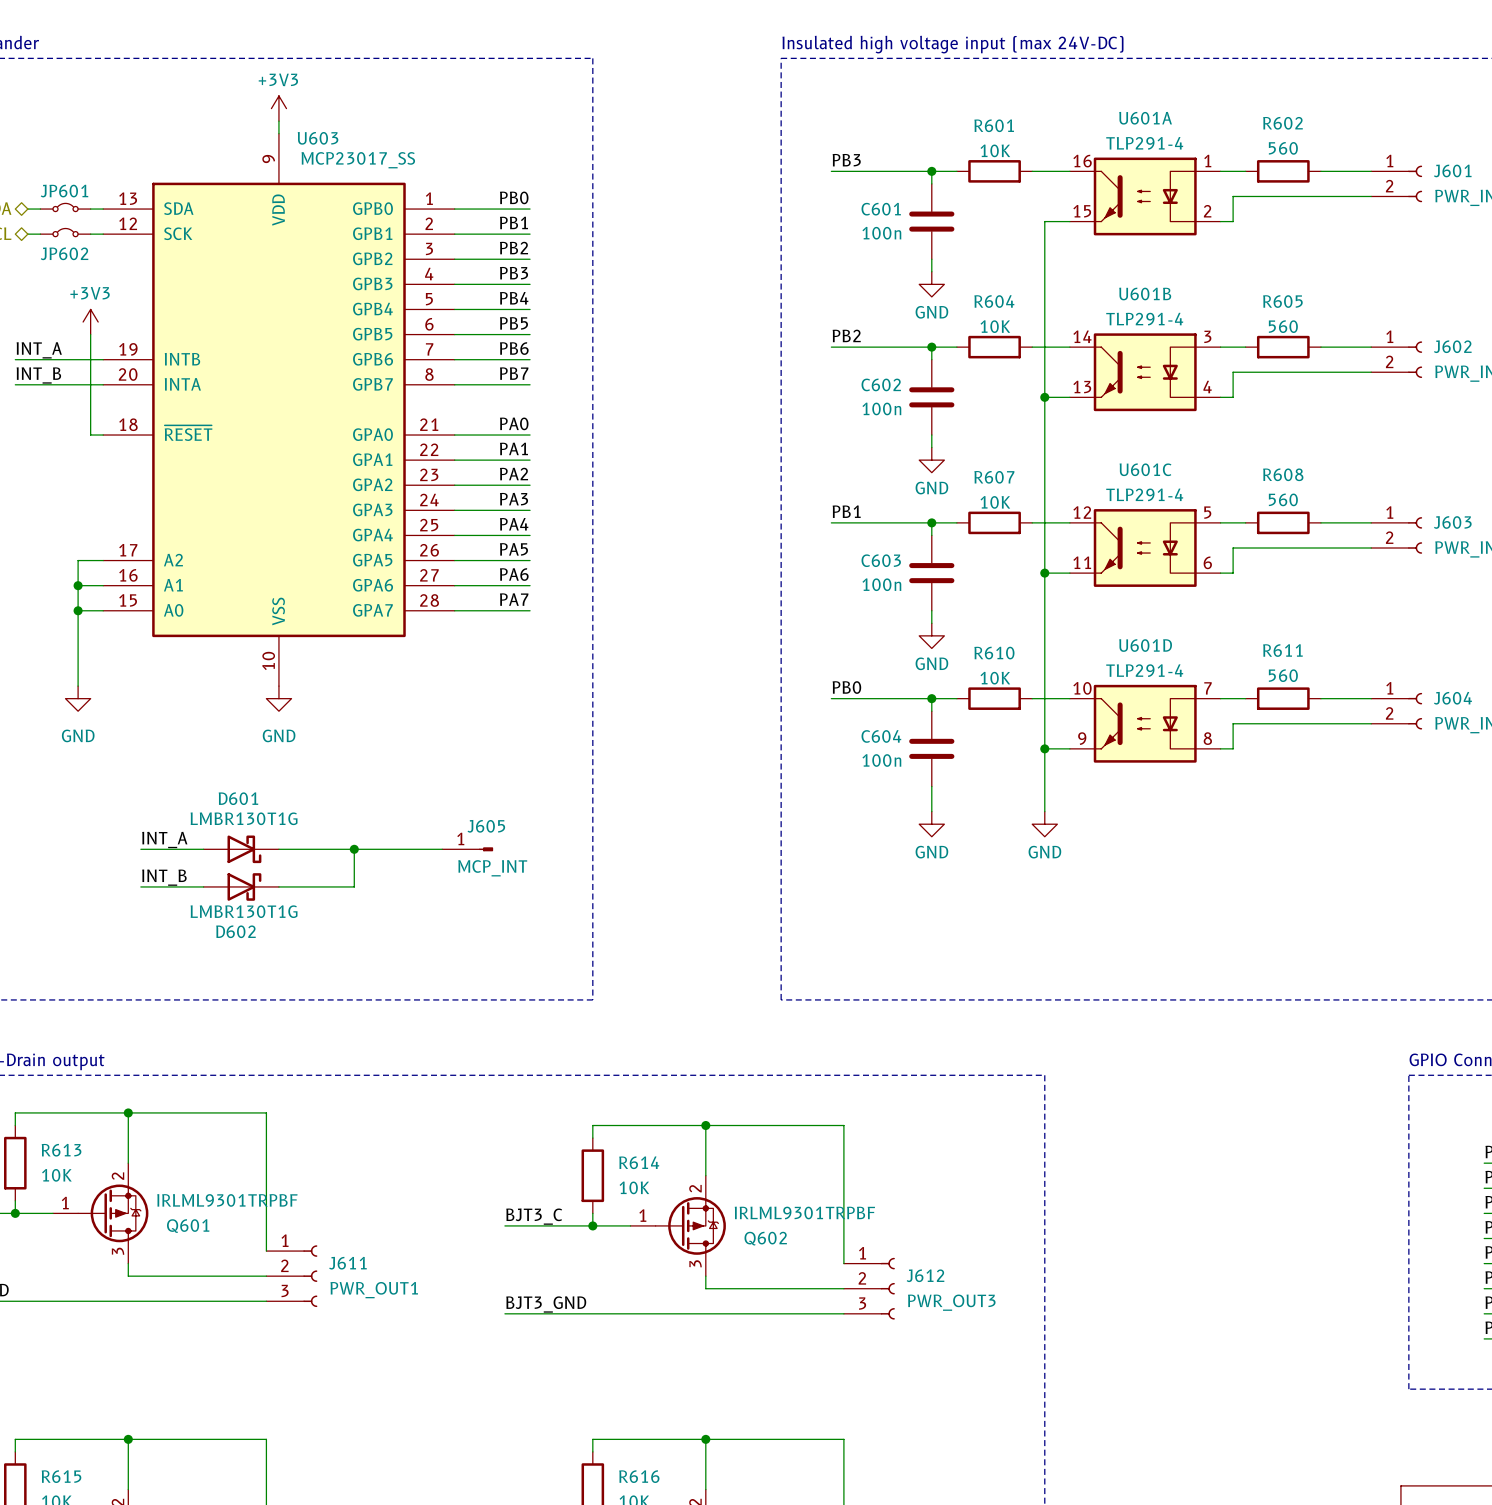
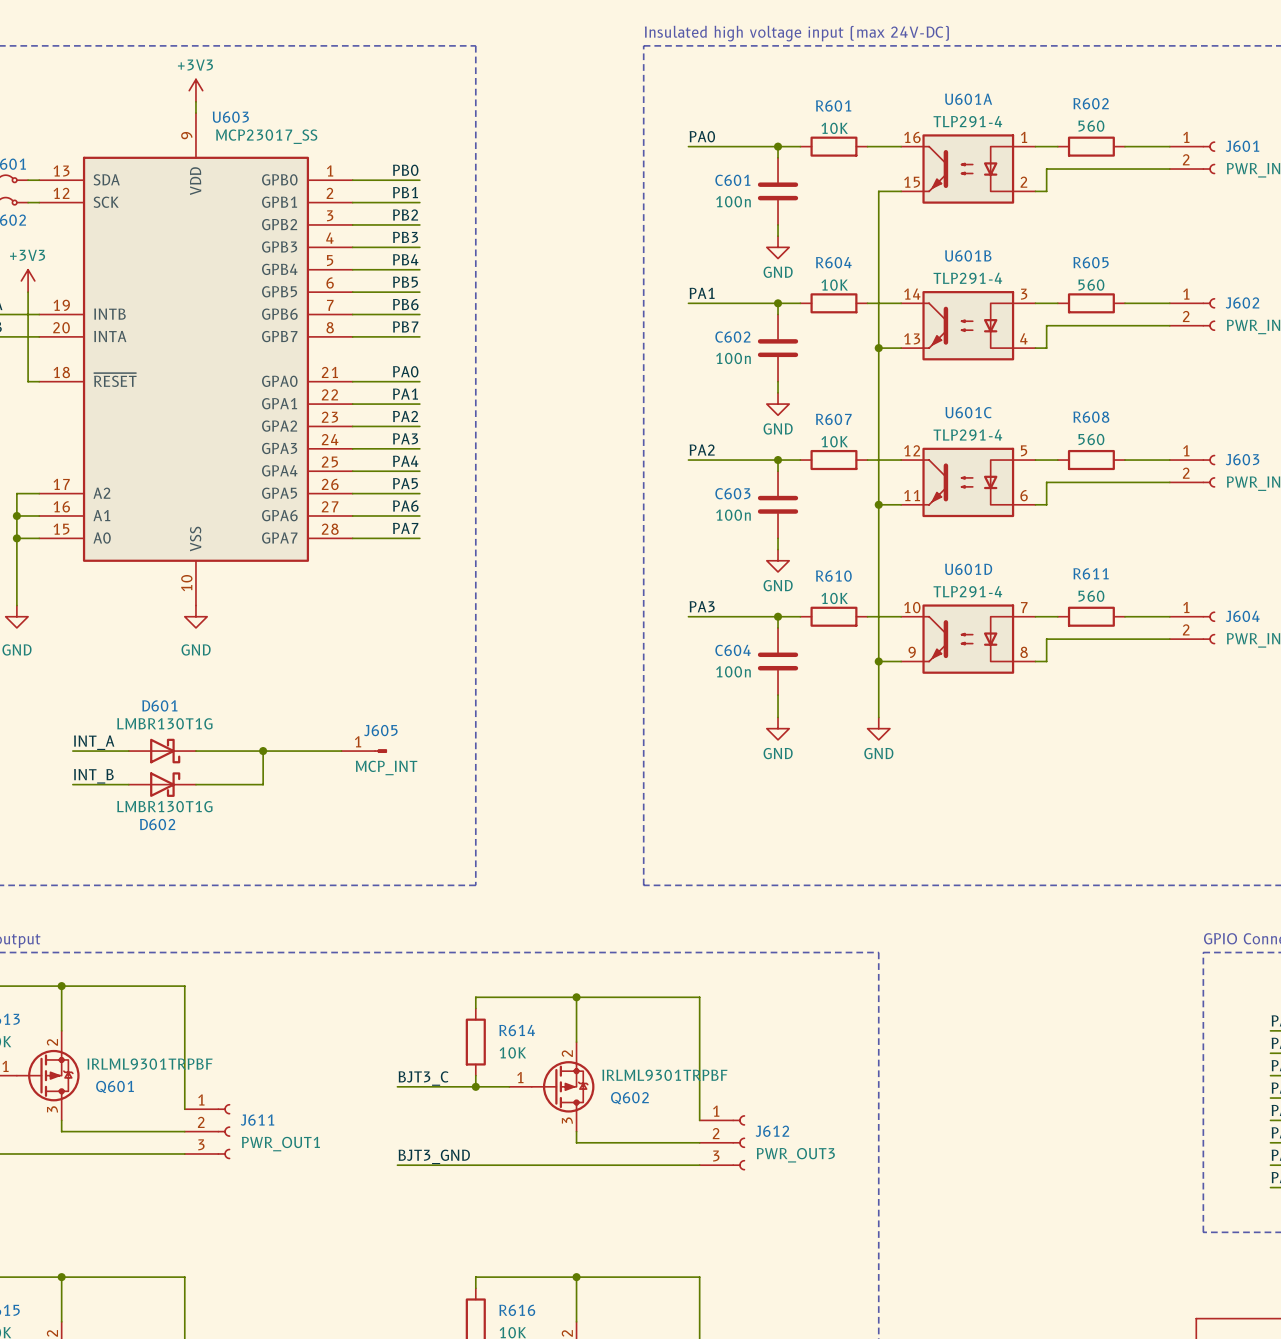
label: PB3 (846, 160) -> PA0 (702, 136)
label: PB2 (846, 335) -> PA1 (702, 293)
label: PB1 (846, 511) -> PA2 (702, 450)
label: PB0 (846, 687) -> PA3 (702, 606)

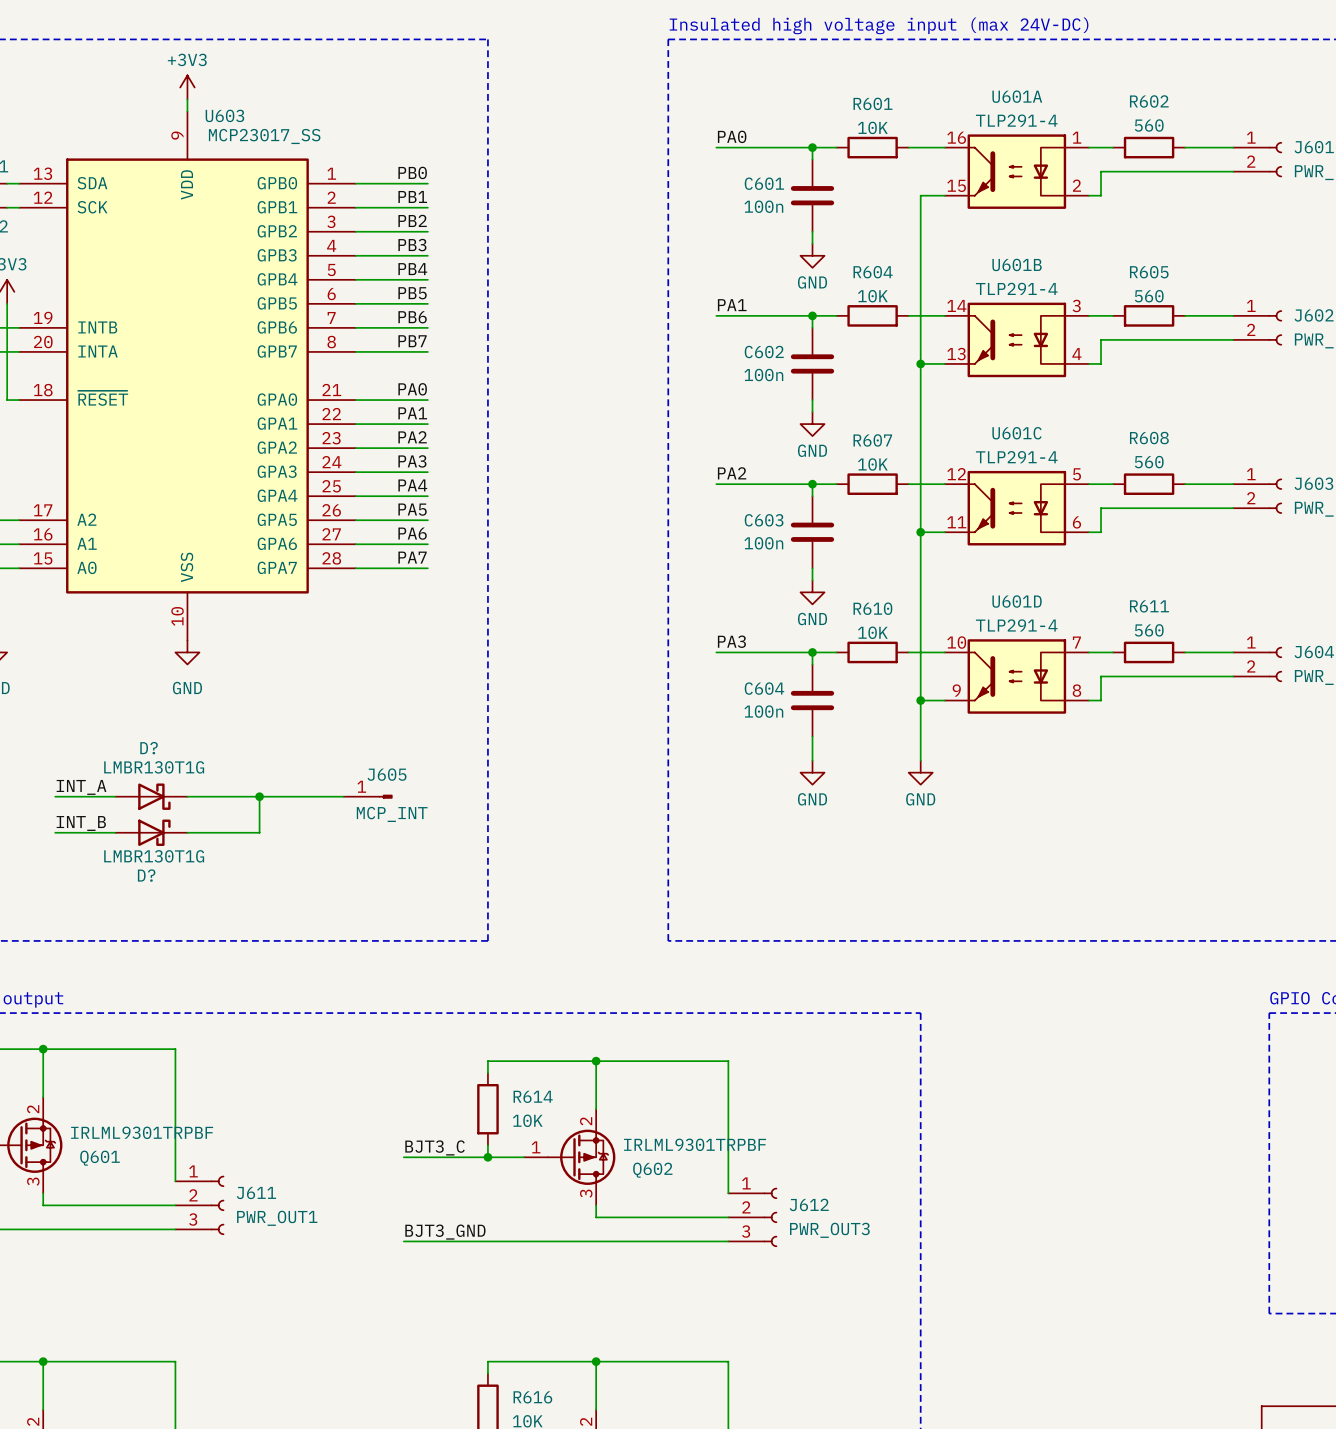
D601 name: D601 (159, 705) -> D? (149, 748)
D602 name: D602 (157, 824) -> D? (146, 875)

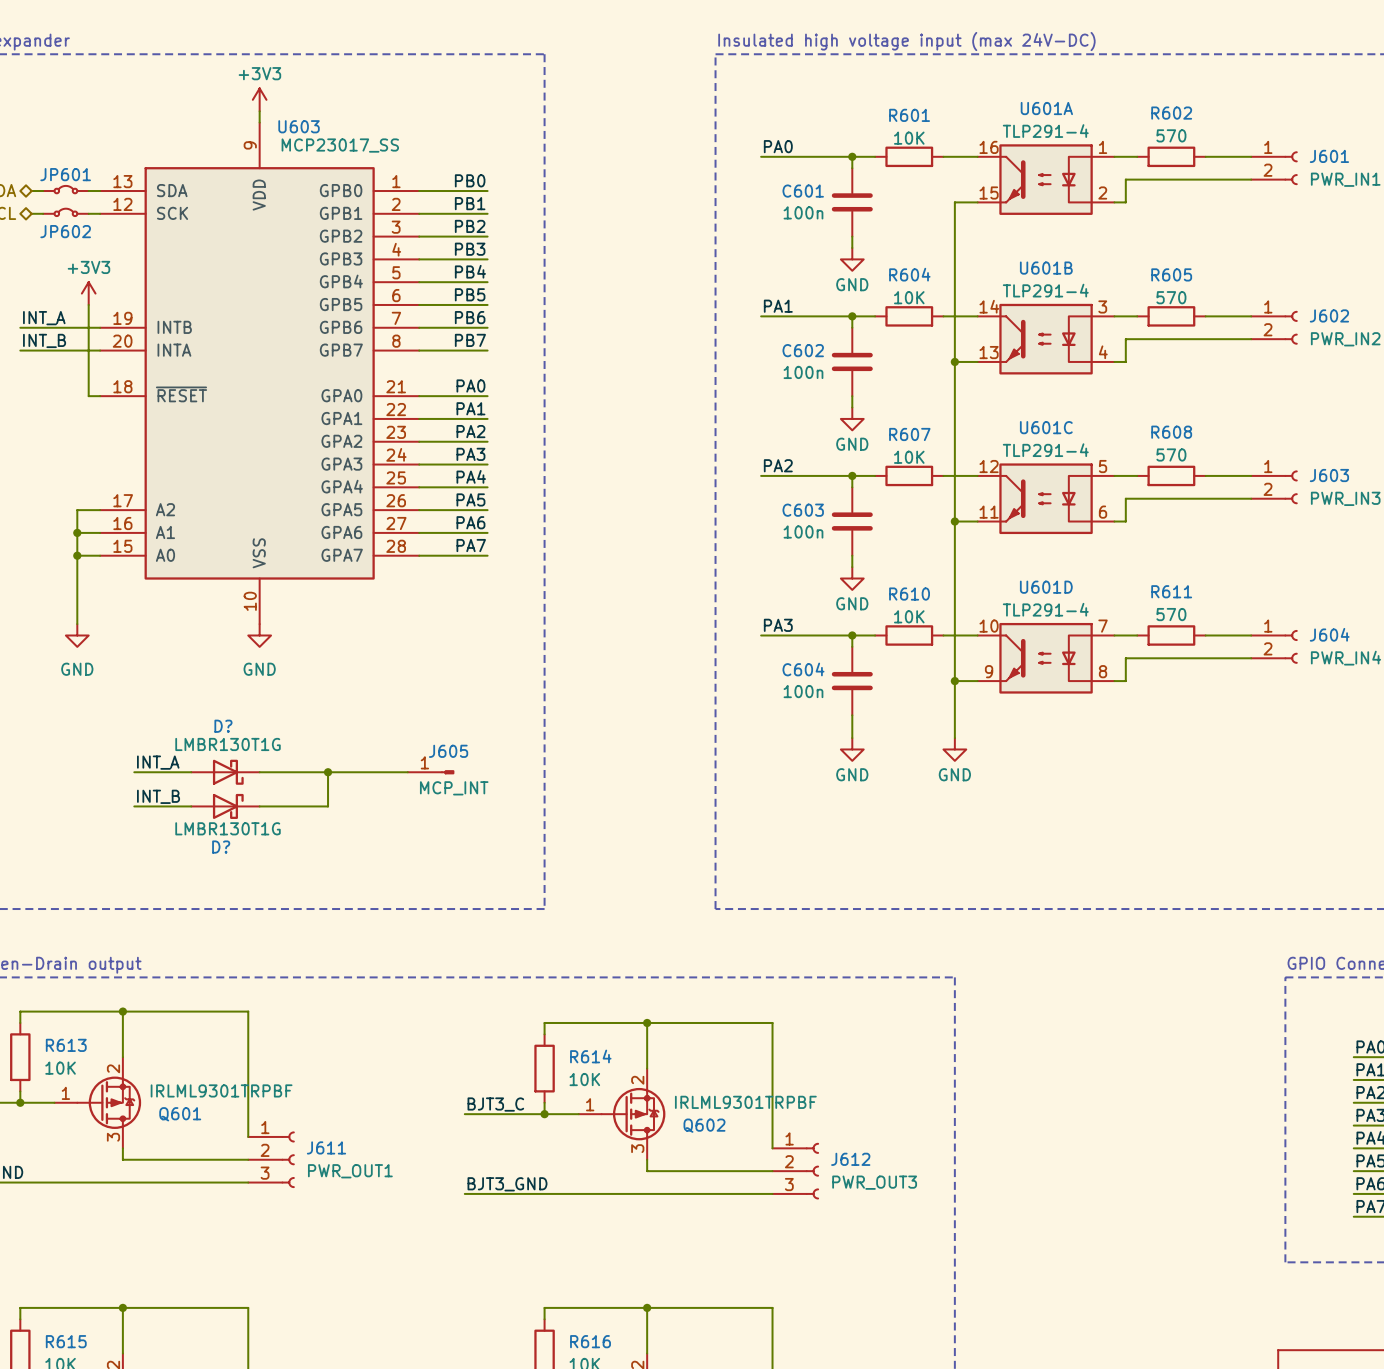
R602 value: 560 (1149, 125) -> 570 (1171, 135)
R605 value: 560 (1149, 296) -> 570 (1171, 297)
R608 value: 560 (1149, 462) -> 570 (1171, 454)
R611 value: 560 (1149, 630) -> 570 (1171, 614)

